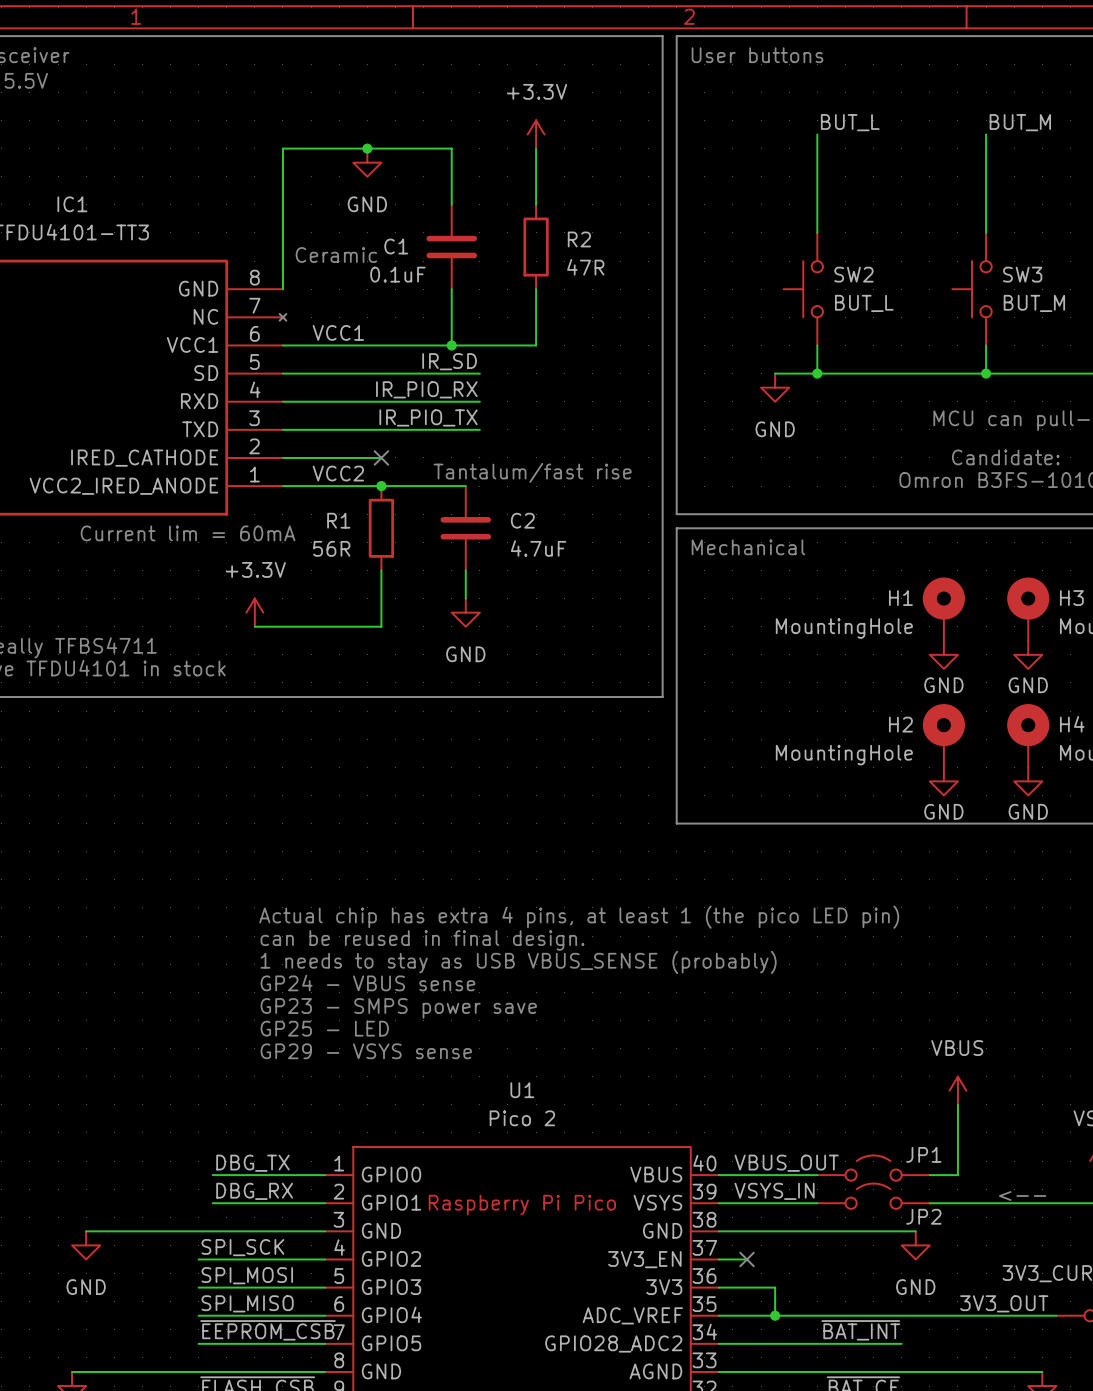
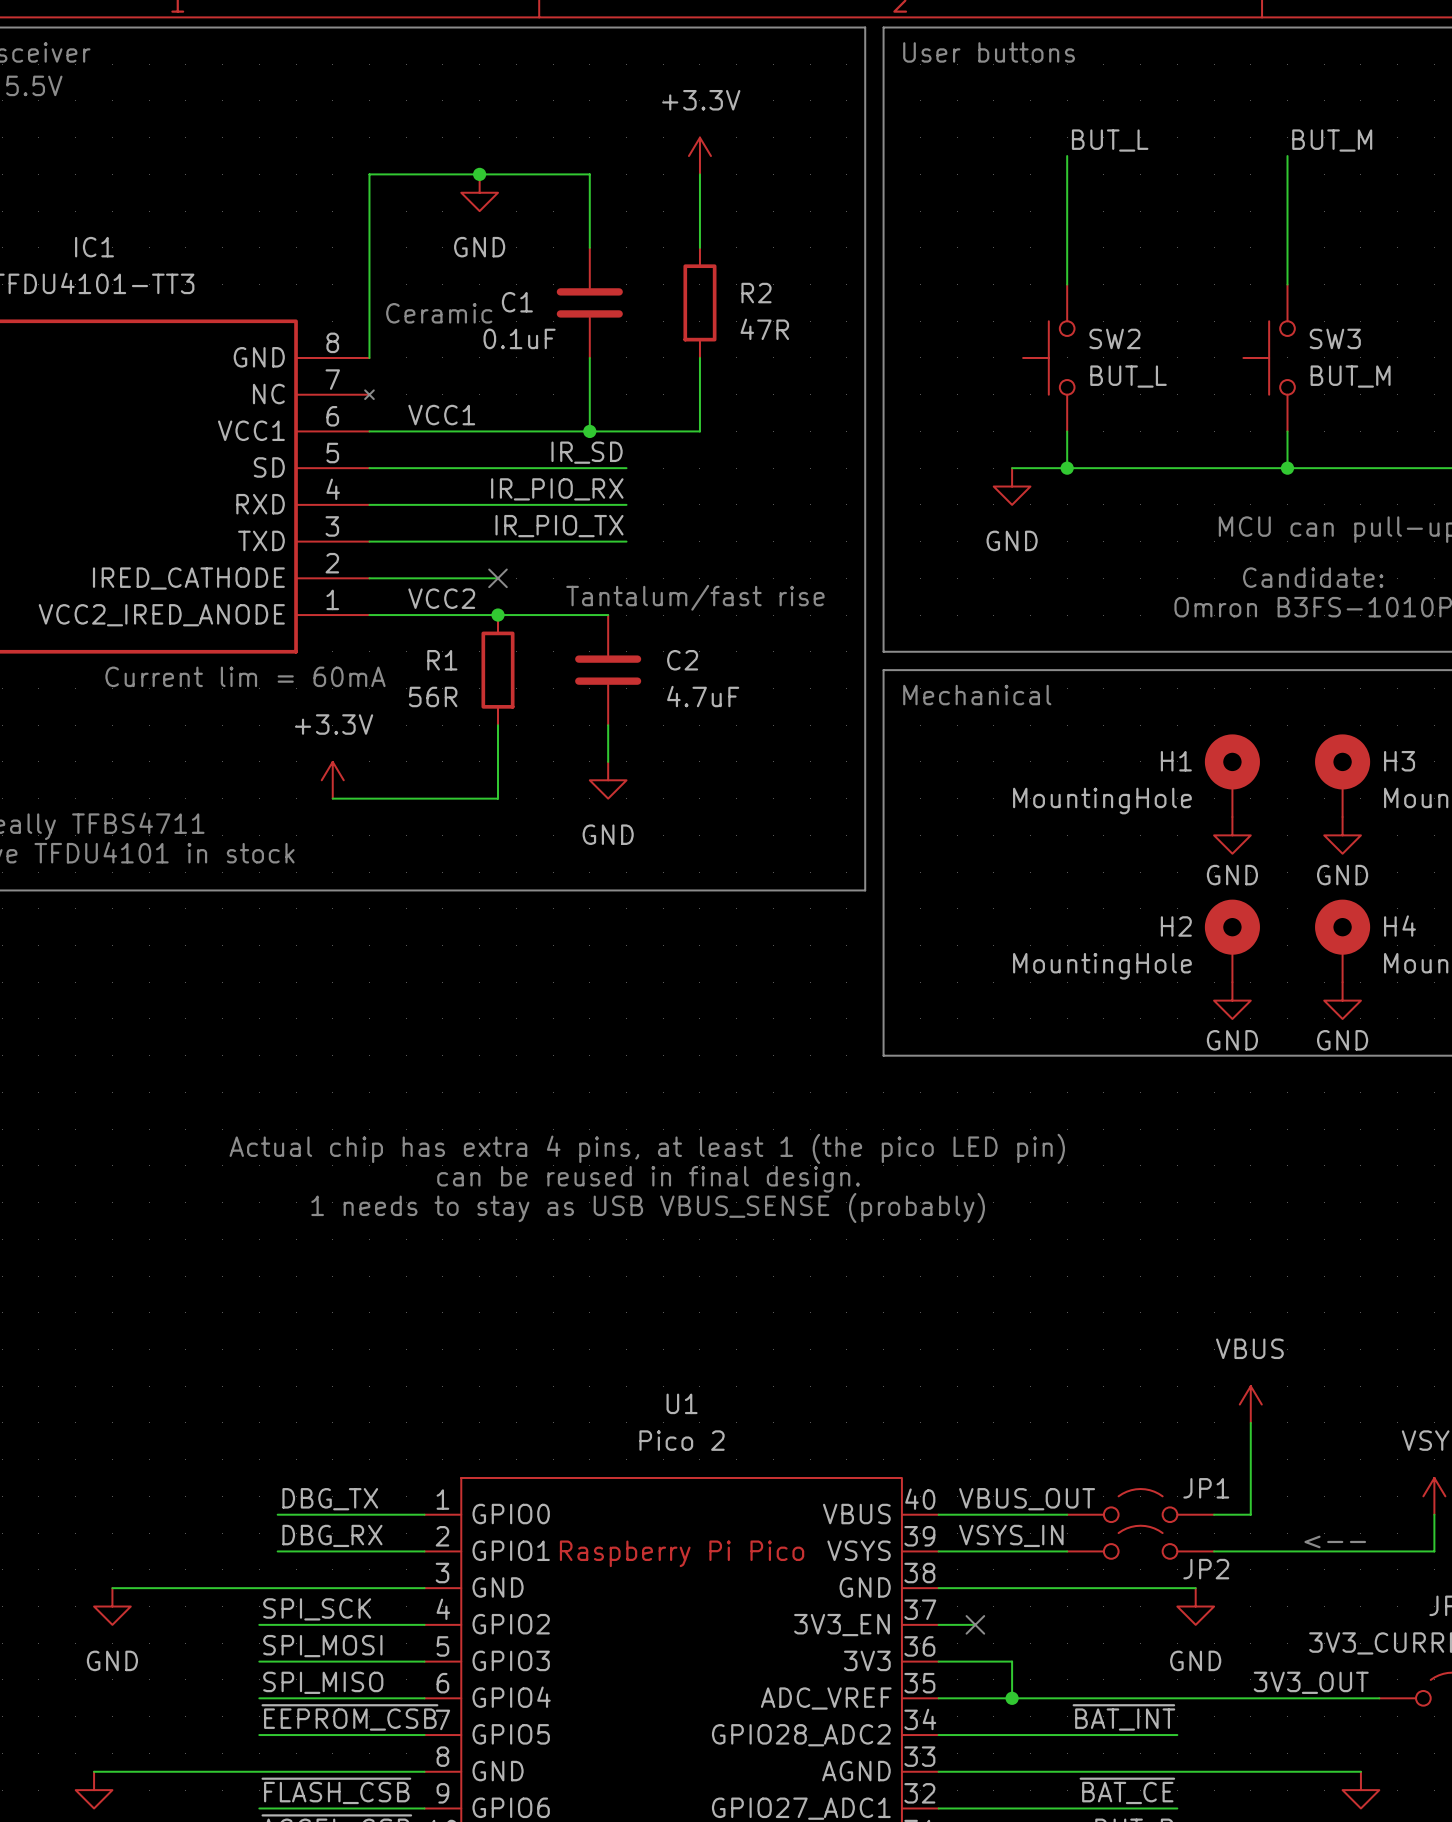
text position: Actual chip has extra 4 pins, at least 1 (the pico LED pin) (579, 917) -> Actual chip has extra 4 pins, at least 1 (the pico LED pin) (647, 1148)
text position: can be reused in final design. (422, 940) -> can be reused in final design. (648, 1179)
text position: 1 needs to stay as USB VBUS_SENSE (probably) (518, 962) -> 1 needs to stay as USB VBUS_SENSE (probably) (648, 1207)
text: GP24 - VBUS sense (367, 983) -> none
text: GP23 - SMPS power save (398, 1008) -> none
text: GP25 - LED (324, 1028) -> none
text: GP29 - VSYS sense (366, 1051) -> none

